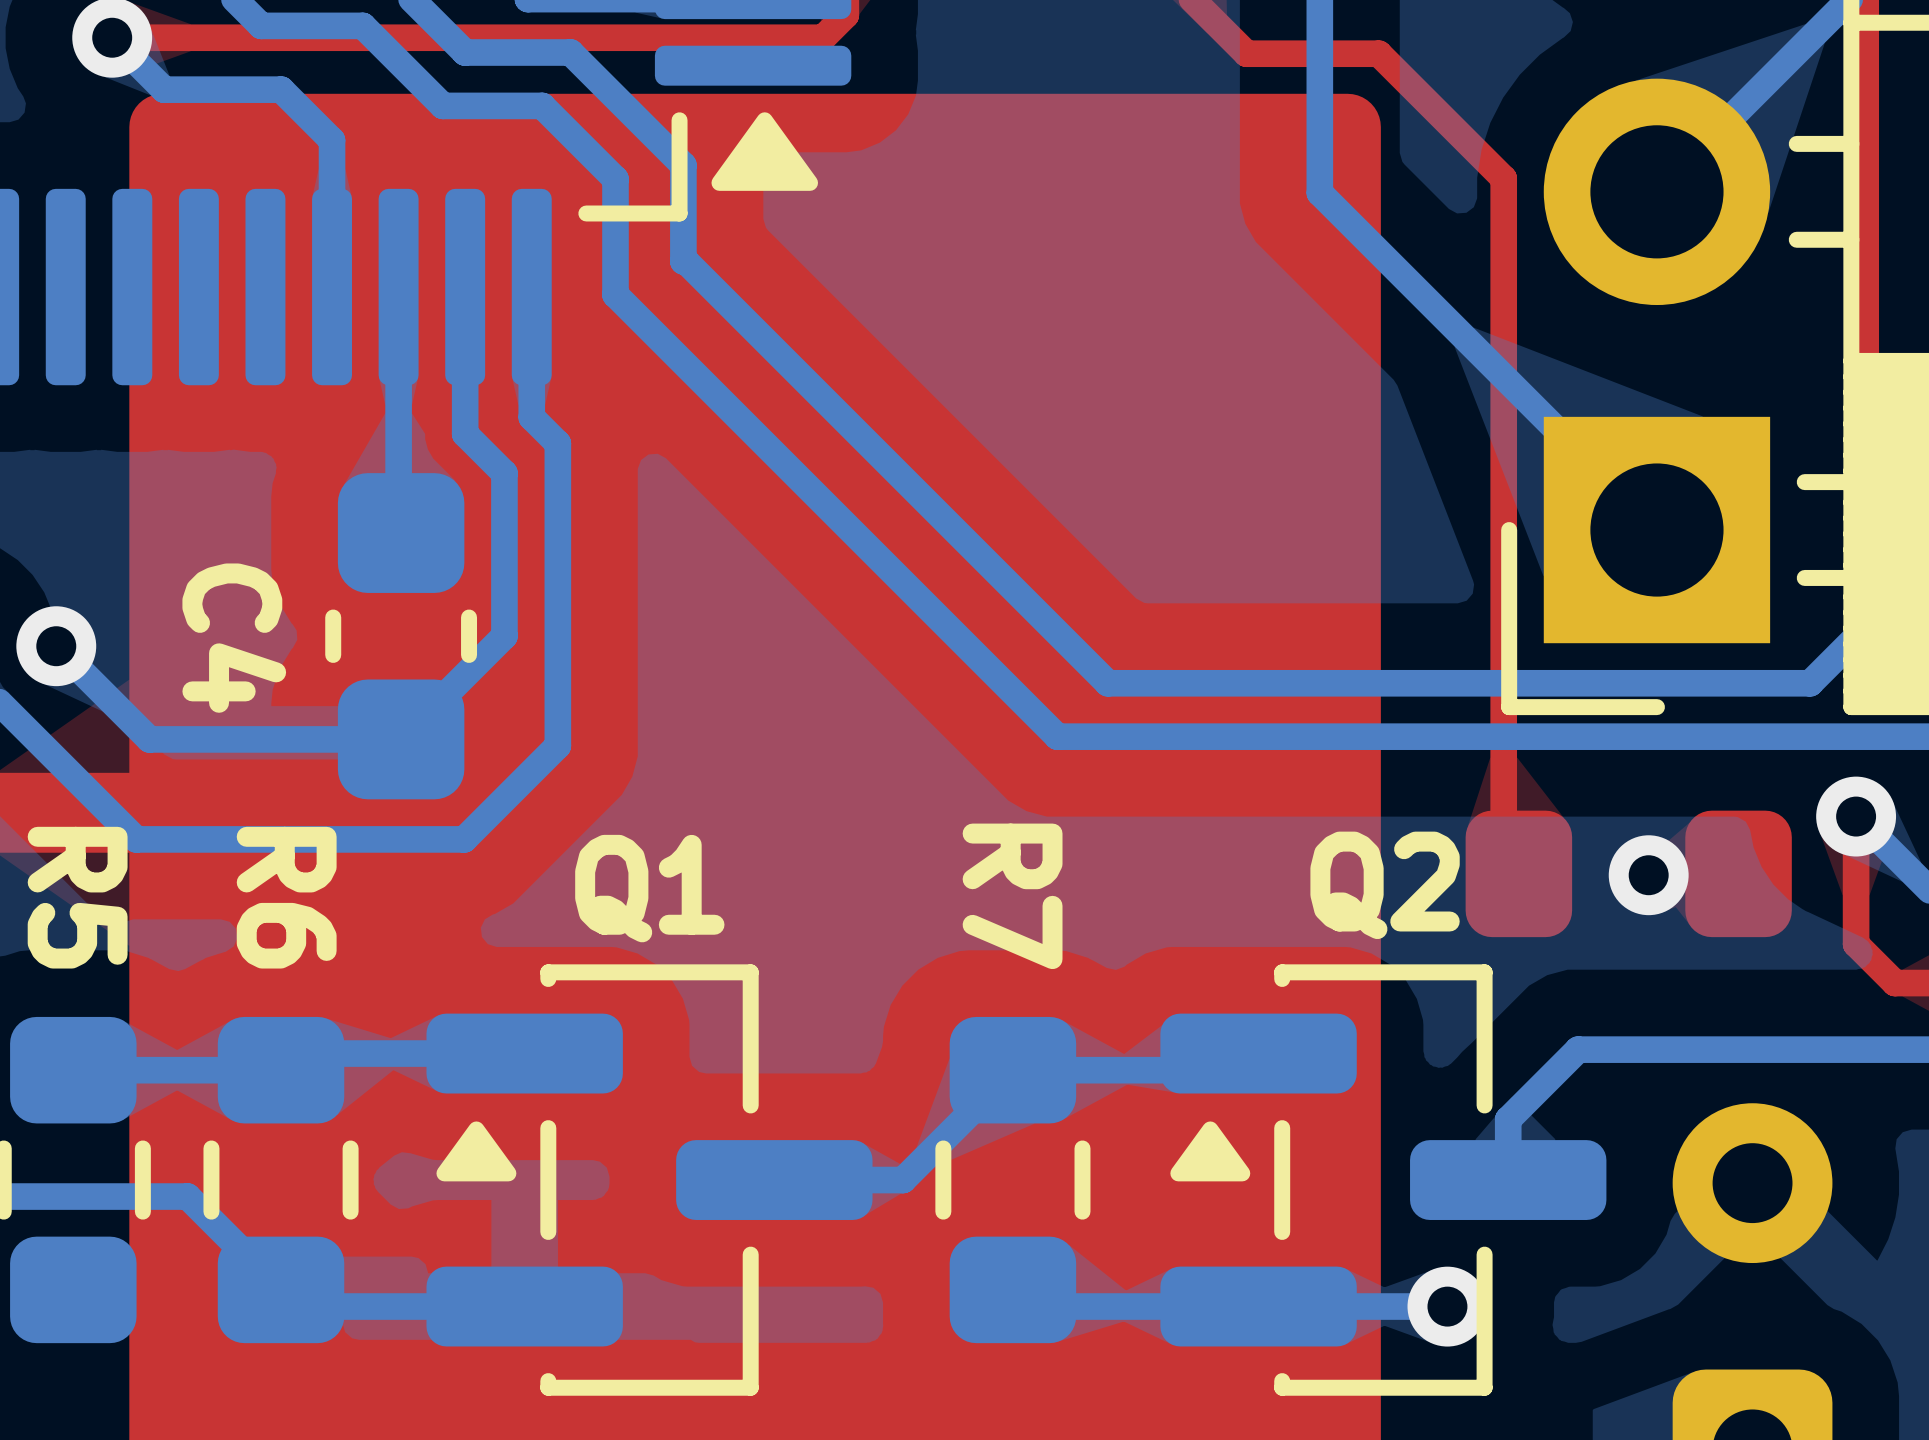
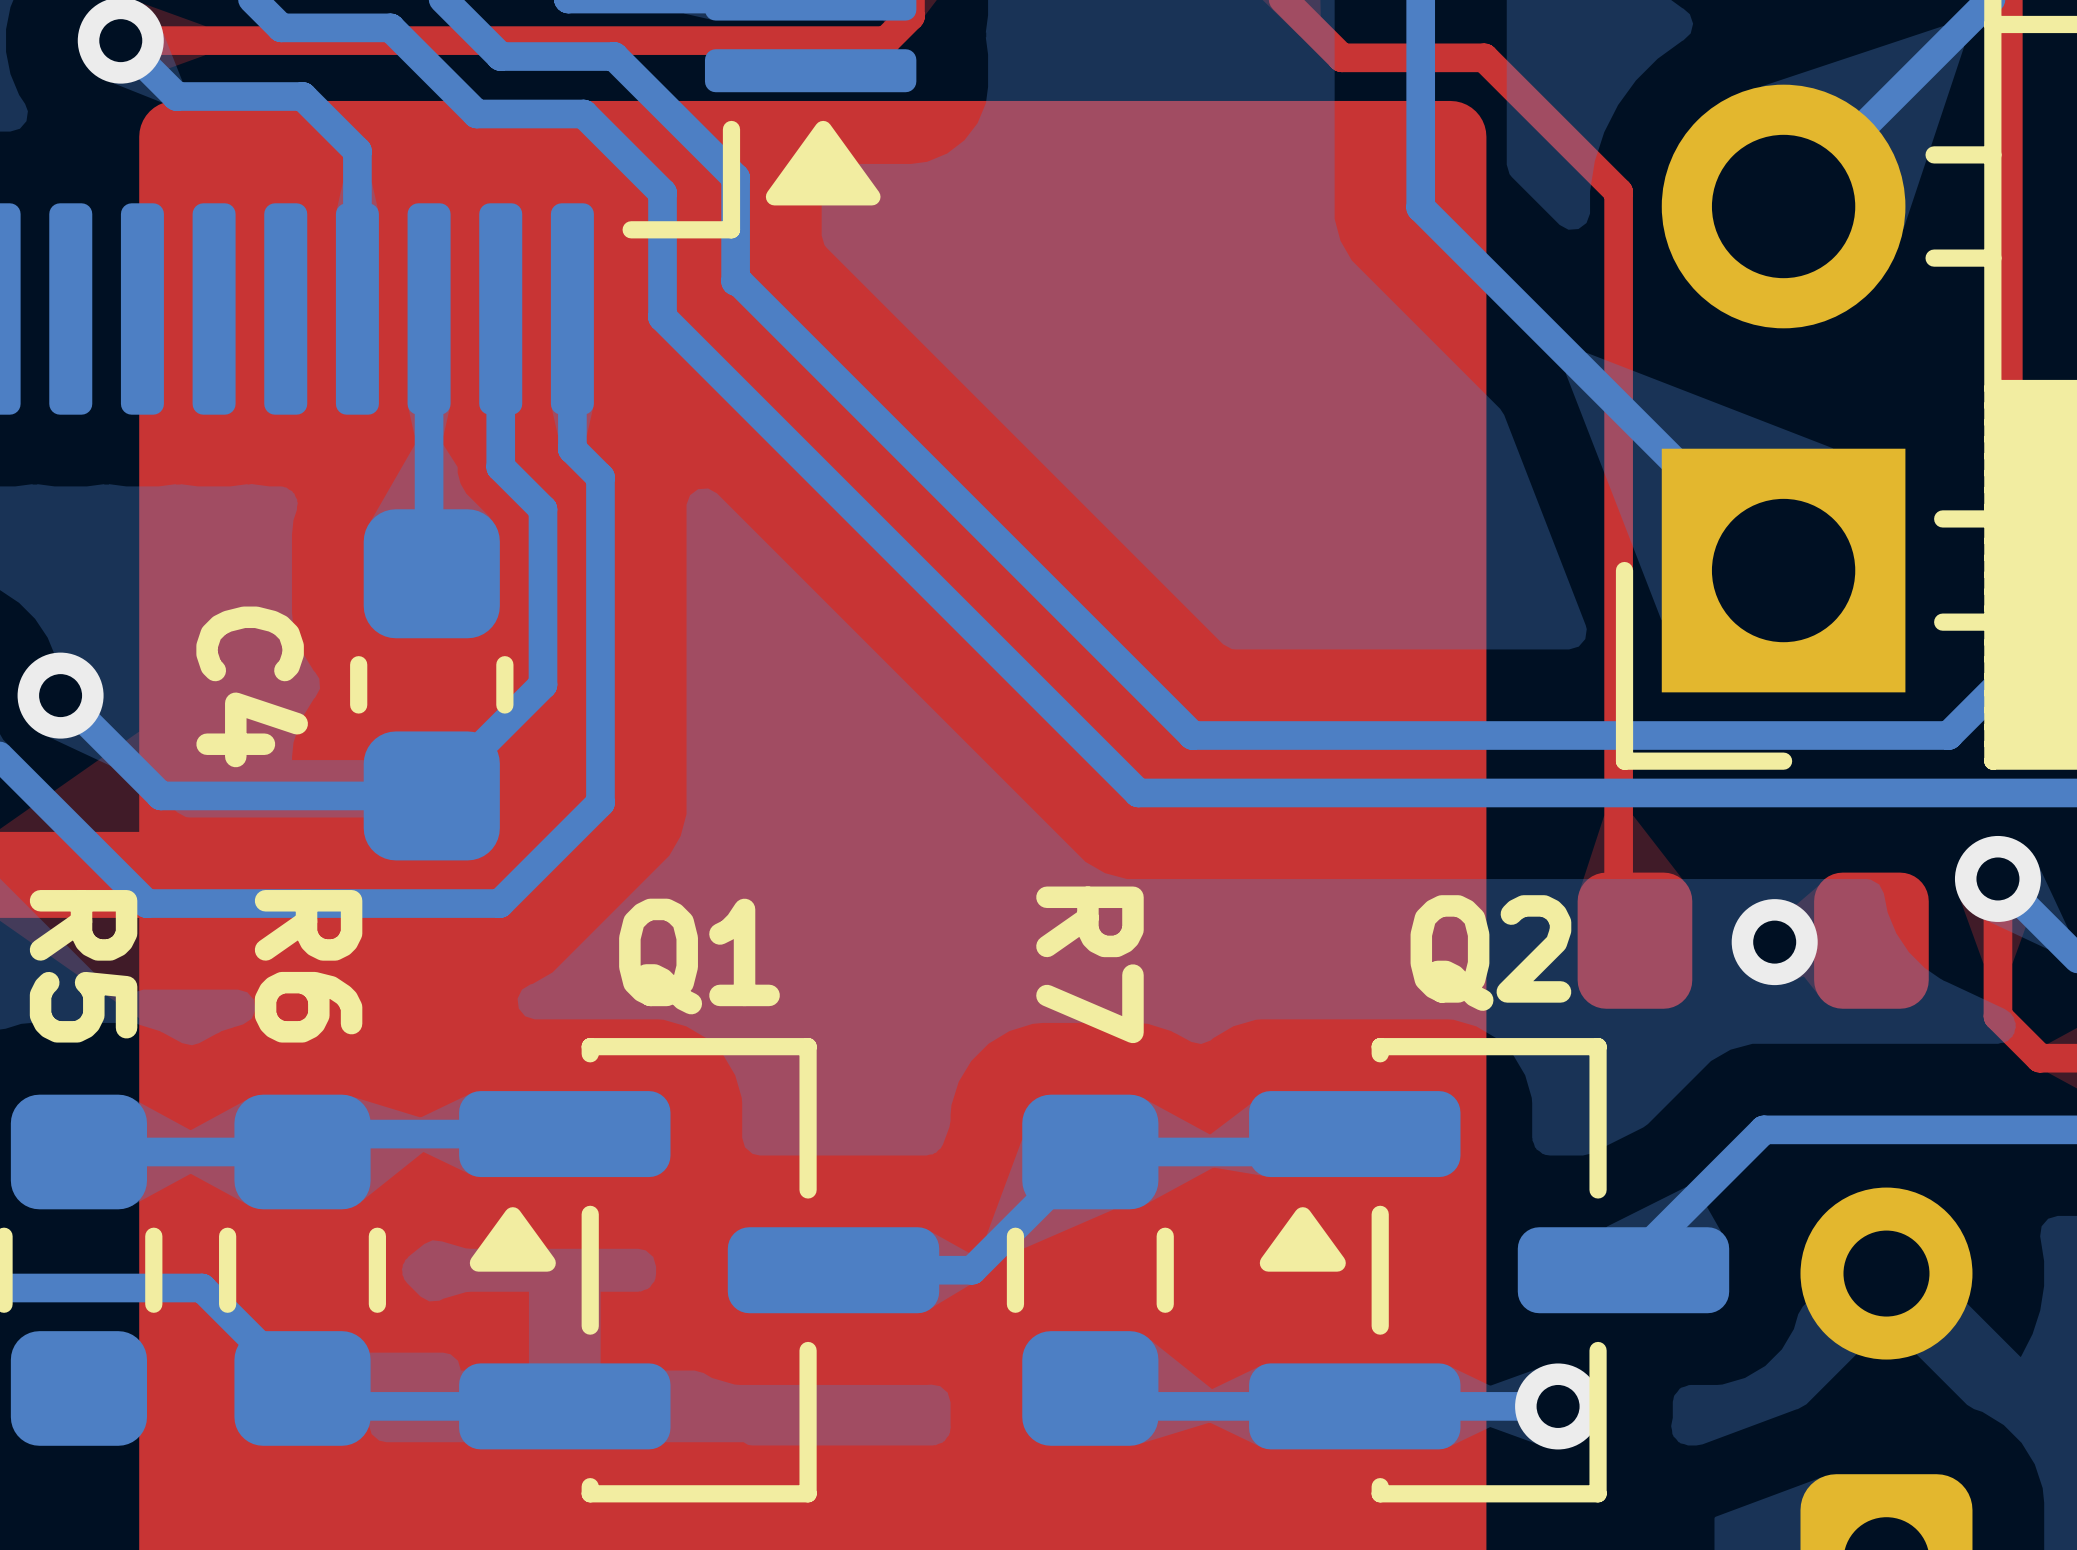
bottom track: (1638, 1049) (1578, 1049) (1508, 1119) (1508, 1180) -> (1763, 1129) (1623, 1270)

